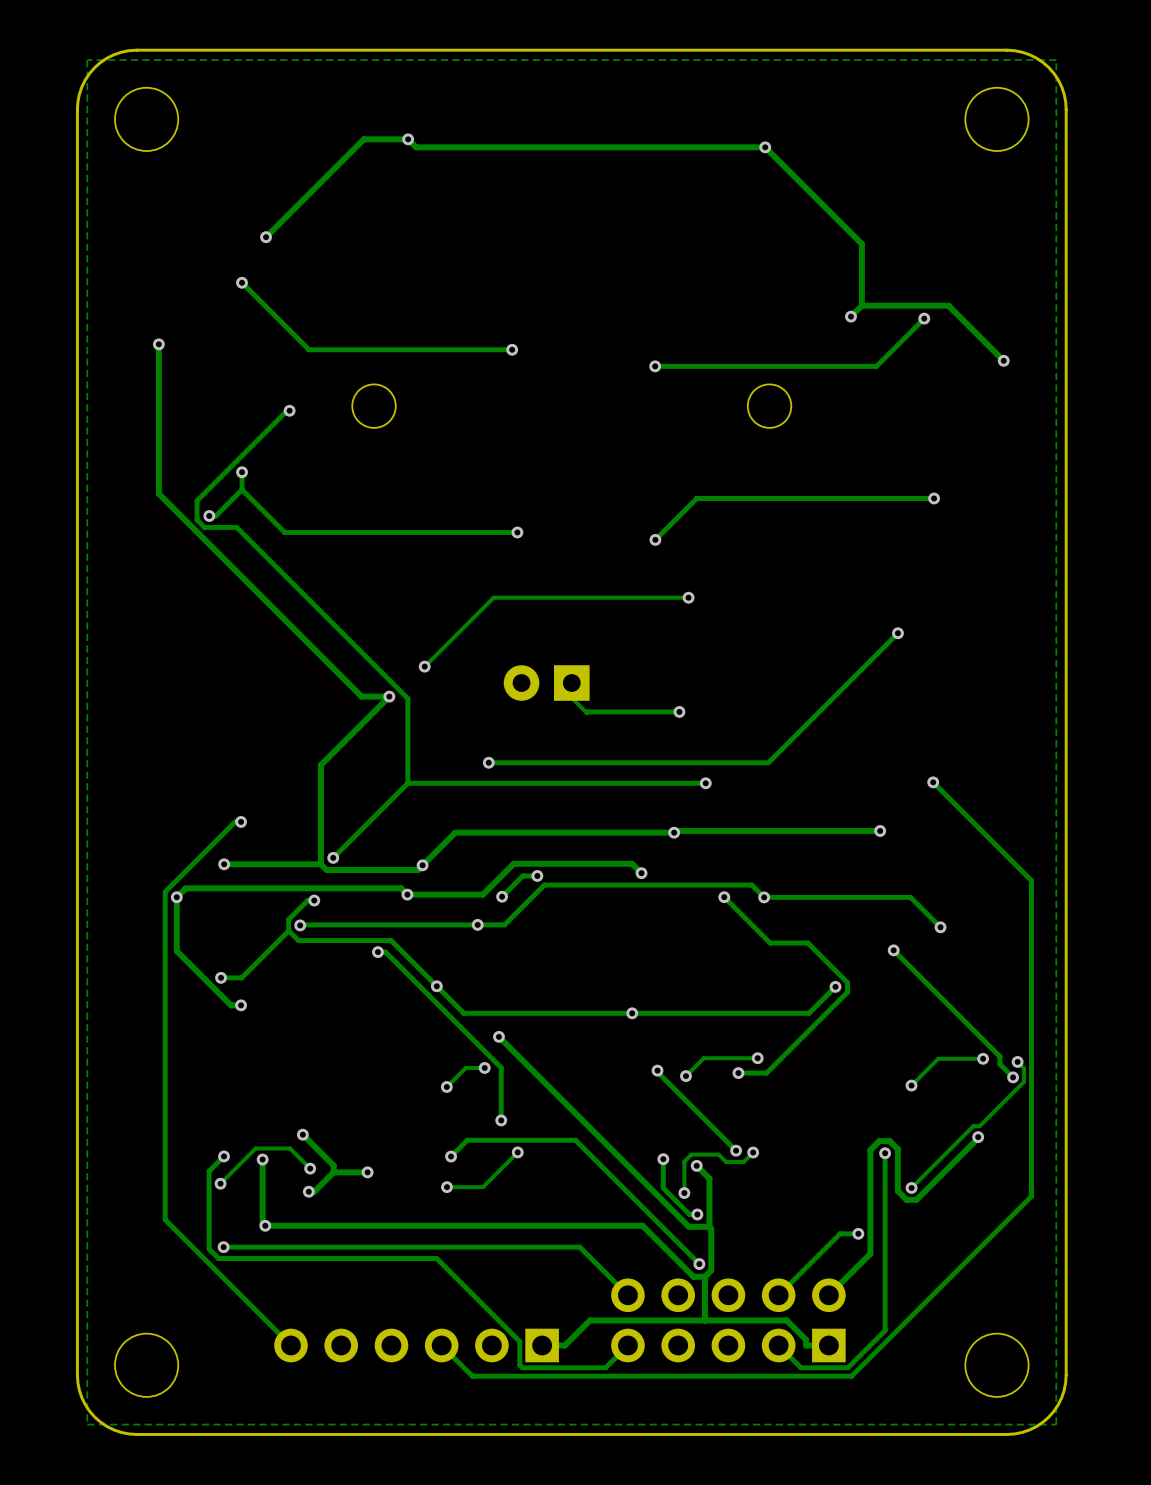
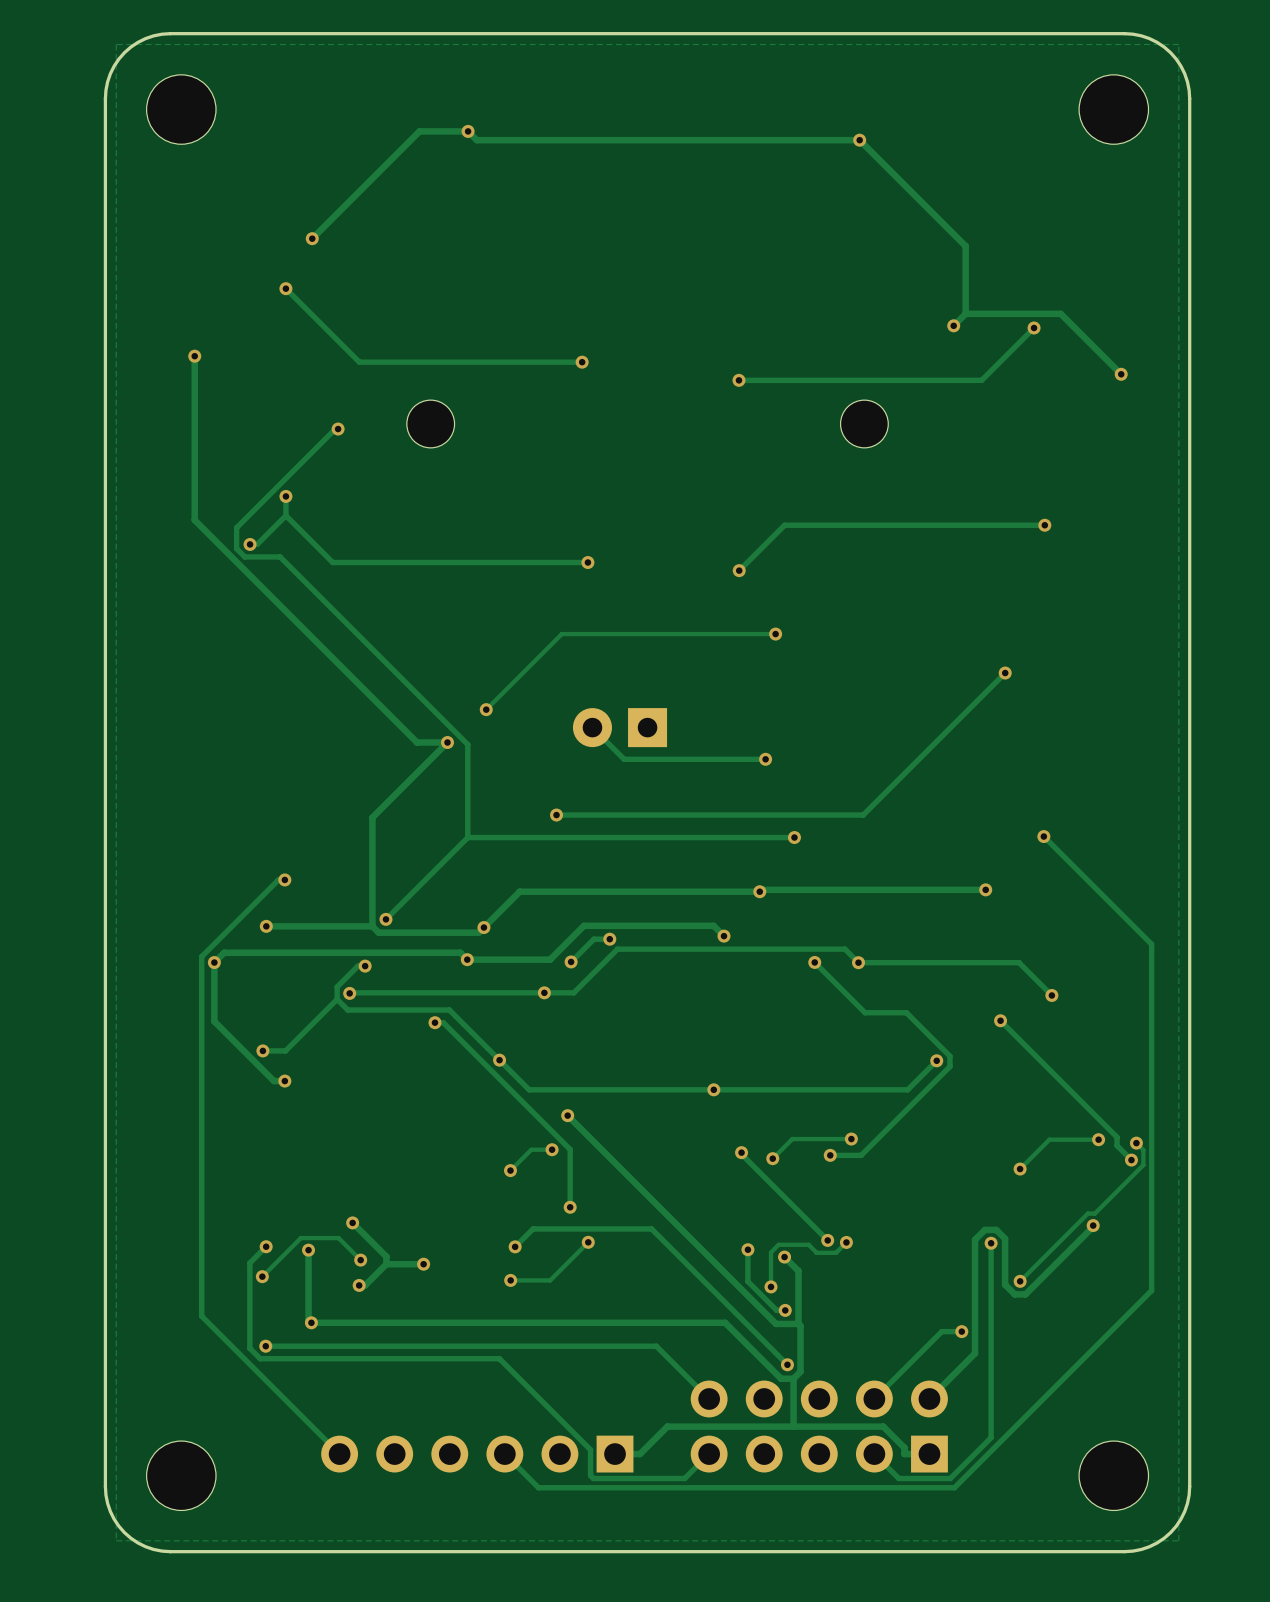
track: (571, 697) (587, 711) -> (592, 727) (624, 759) (664, 759)

